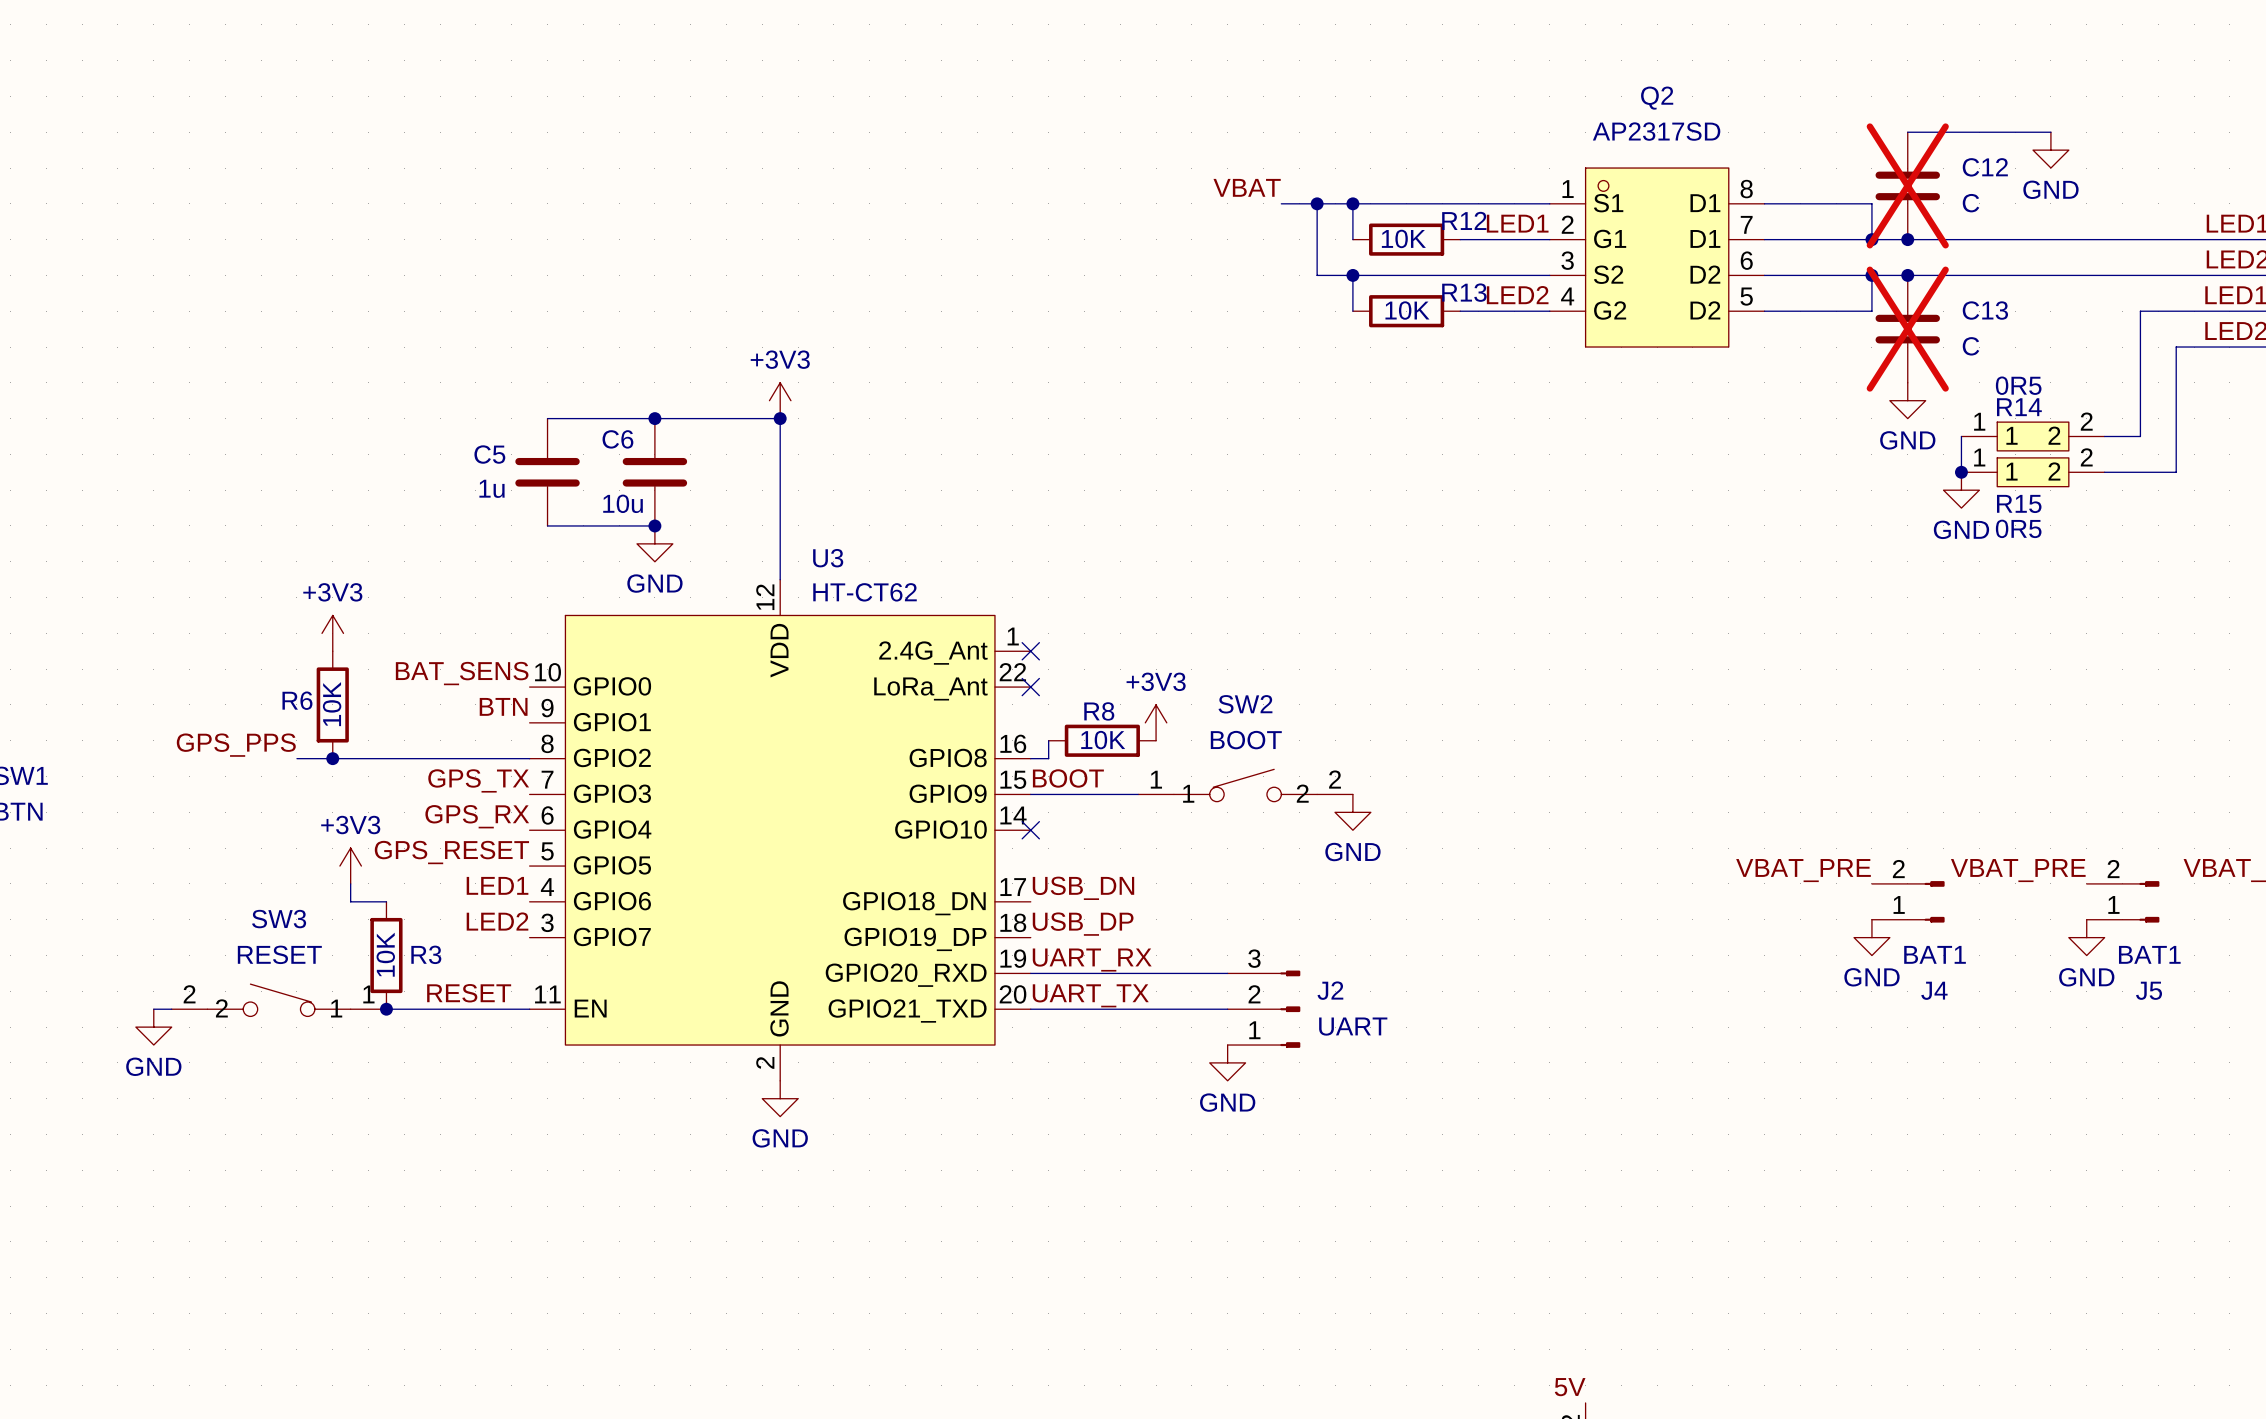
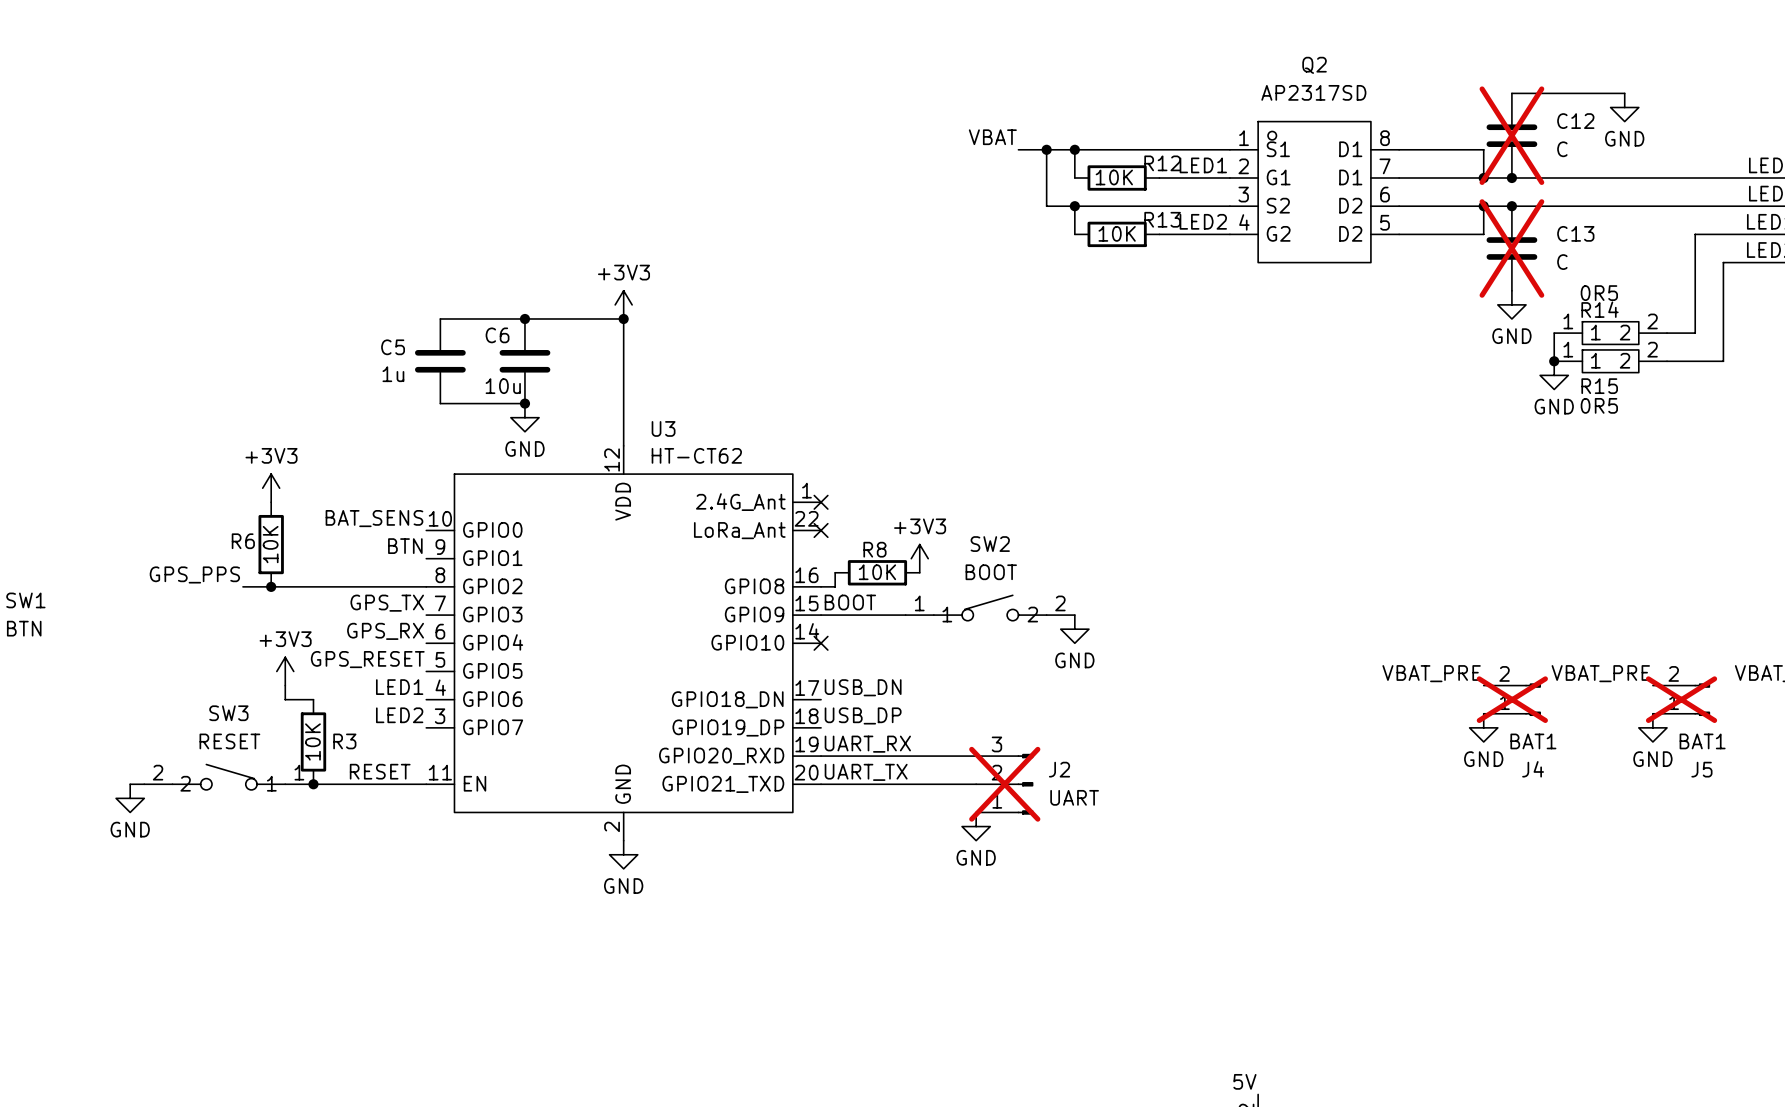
J4 do-not-place cross: none -> (1512, 699)
J5 do-not-place cross: none -> (1681, 699)
J2 do-not-place cross: none -> (1004, 784)

